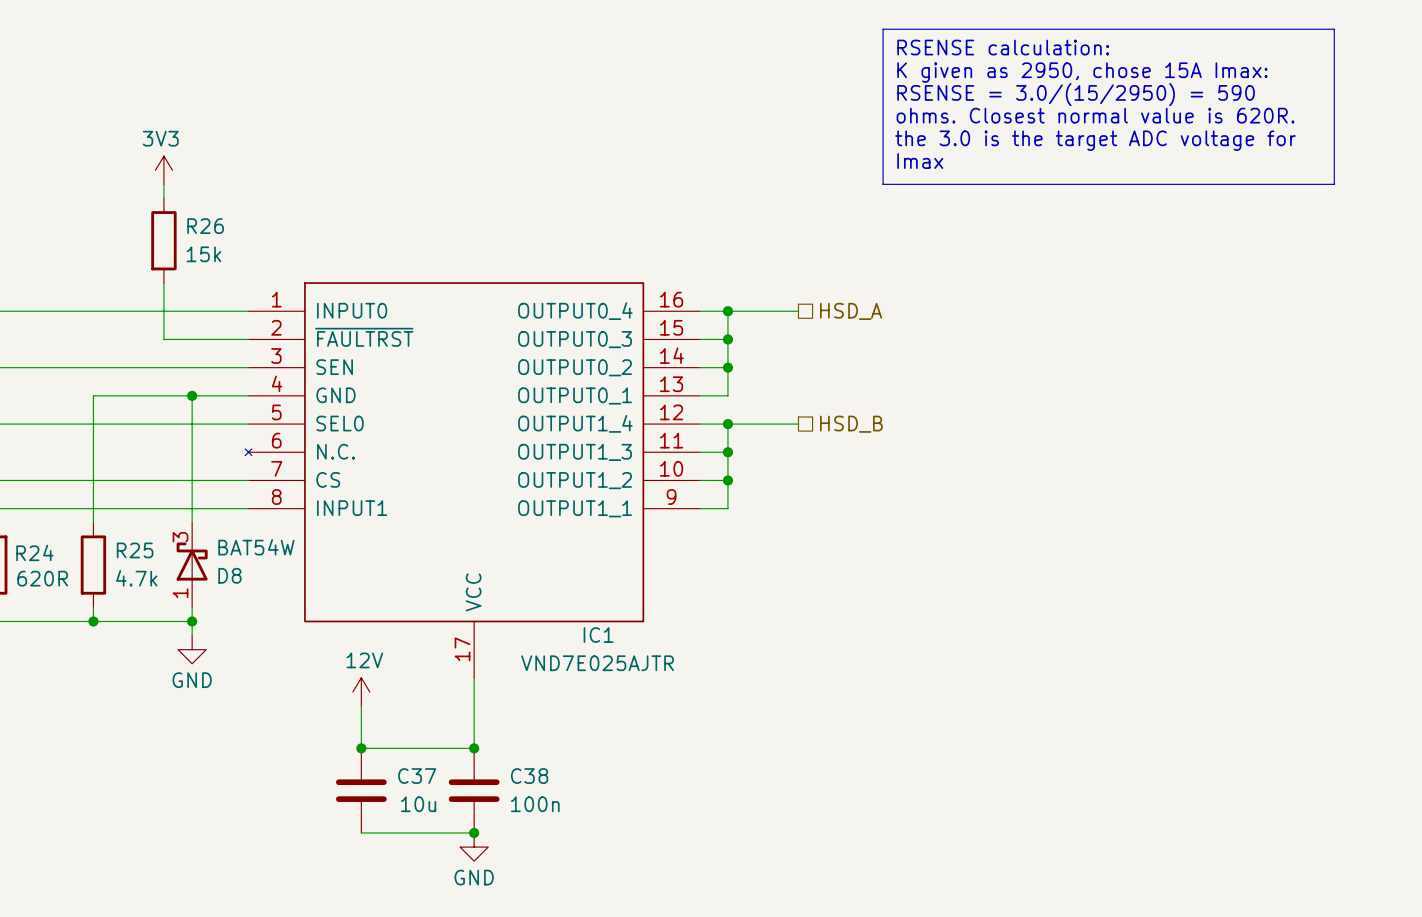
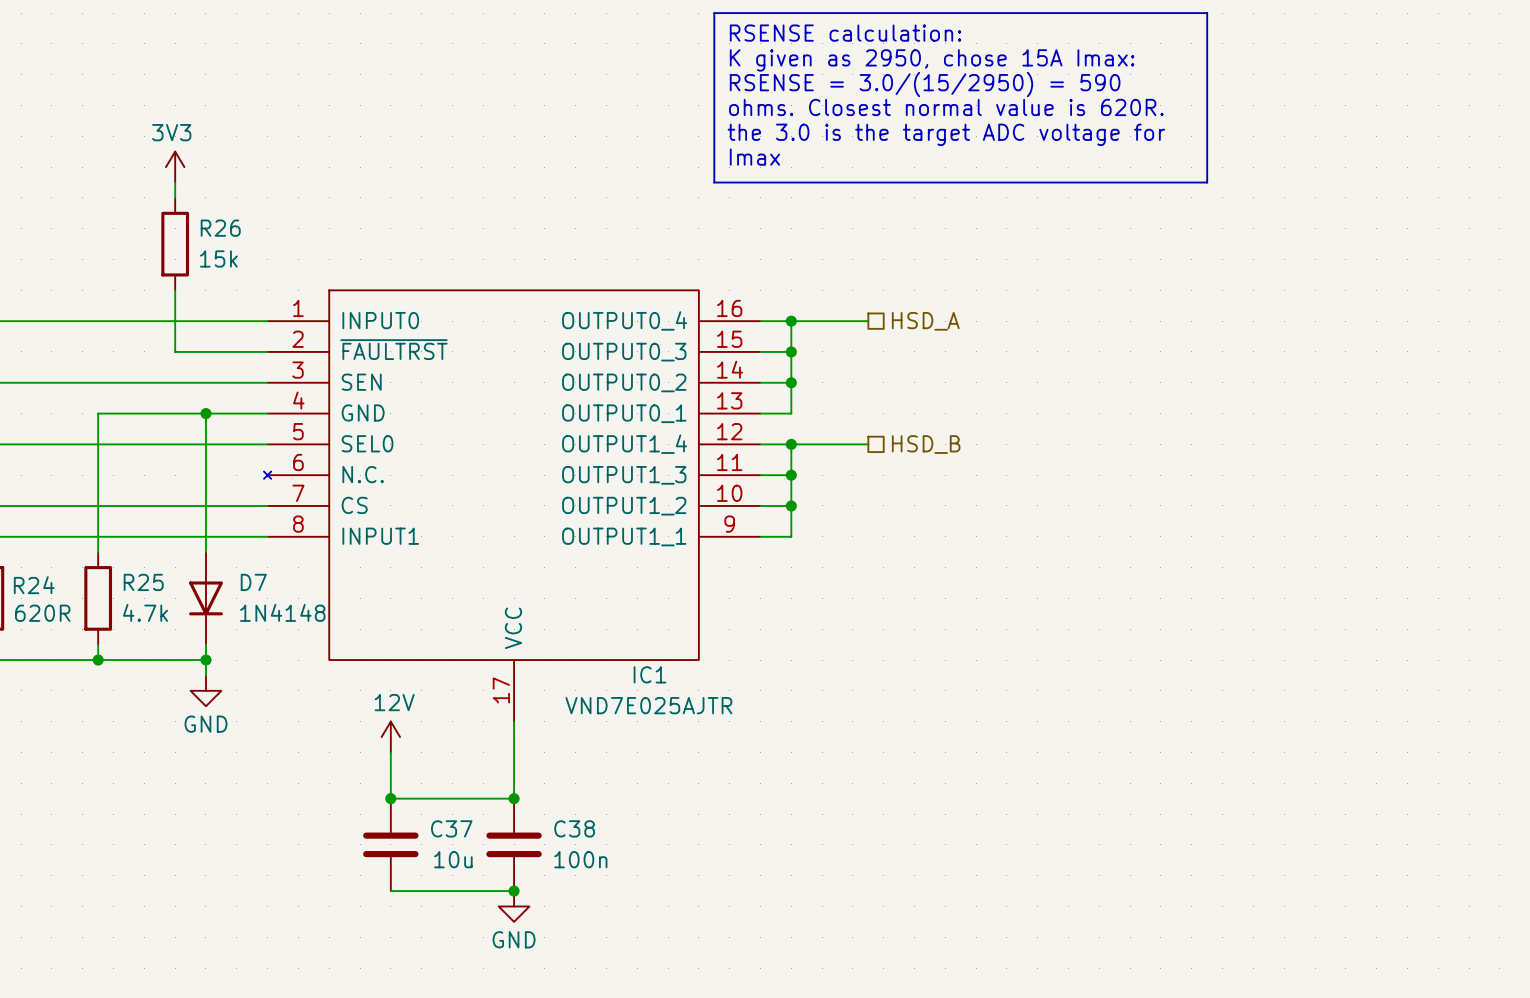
line: (883, 29) (883, 184) -> (960, 13) (714, 13) (714, 182) (960, 182)
line: (1108, 29) (1334, 29) (1334, 184) (1108, 184) -> (1207, 13) (1207, 182)
text position: RSENSE calculation: (1003, 47) -> RSENSE calculation: (845, 33)
text position: K given as 2950, chose 15A Imax: (1082, 72) -> K given as 2950, chose 15A Imax: (932, 60)
text position: RSENSE = 3.0/(15/2950) = 590 (1076, 94) -> RSENSE = 3.0/(15/2950) = 590 (925, 84)
text position: ohms. Closest normal value is 620R. (1095, 115) -> ohms. Closest normal value is 620R. (946, 107)
text position: the 3.0 is the target ADC voltage for (1095, 140) -> the 3.0 is the target ADC voltage for (946, 134)
text position: Imax (920, 161) -> Imax (754, 157)
D8: BAT54W (192, 565) -> none
D7: none -> 1N4148 (205, 598)

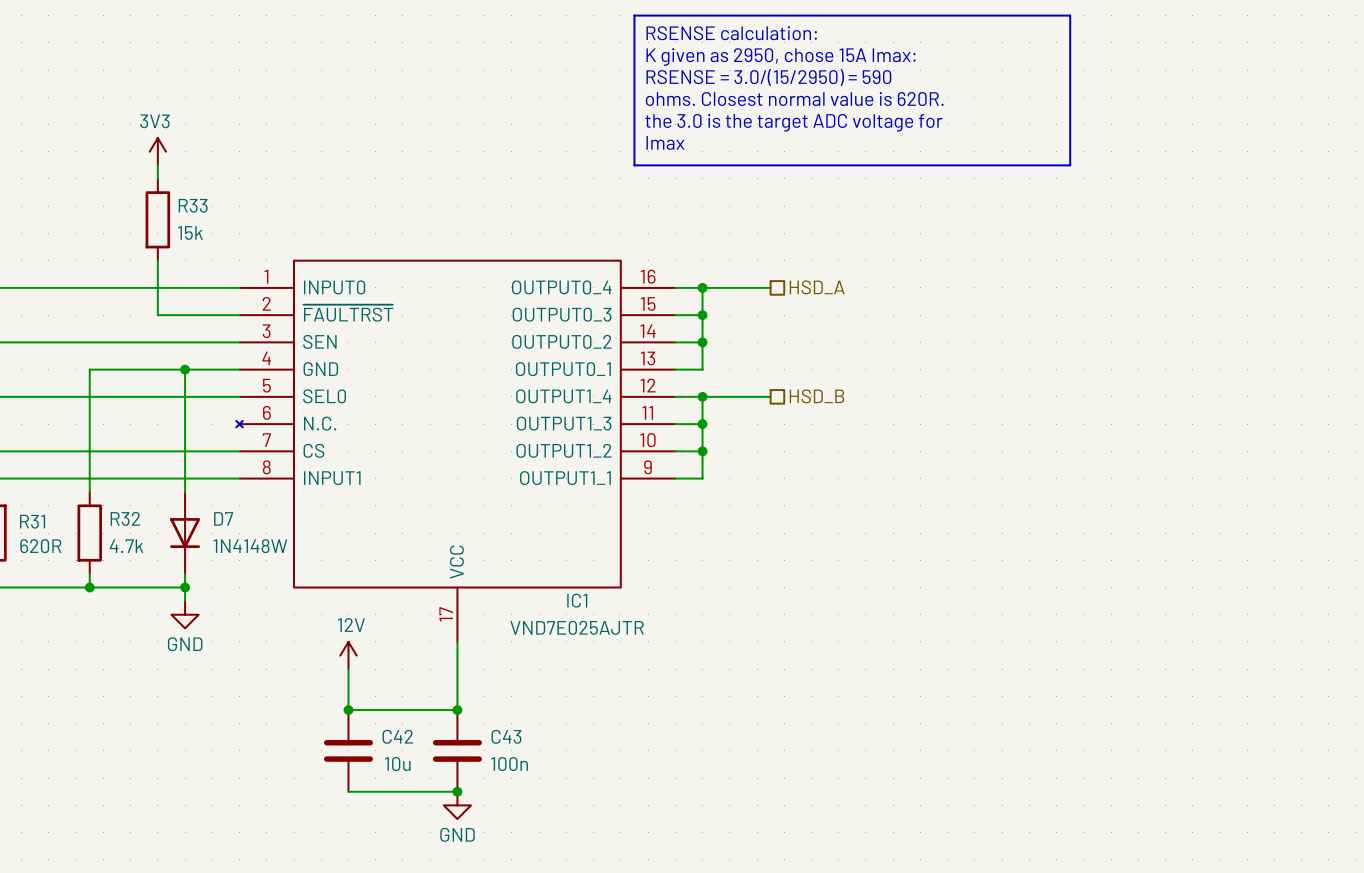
R26 name: R26 (220, 228) -> R33 (193, 205)
R25 name: R25 (143, 582) -> R32 (125, 518)
R24 name: R24 (34, 585) -> R31 (32, 521)
D7 value: 1N4148 (282, 612) -> 1N4148W (250, 546)
C37 name: C37 (451, 828) -> C42 (397, 736)
C38 name: C38 (574, 828) -> C43 (506, 736)

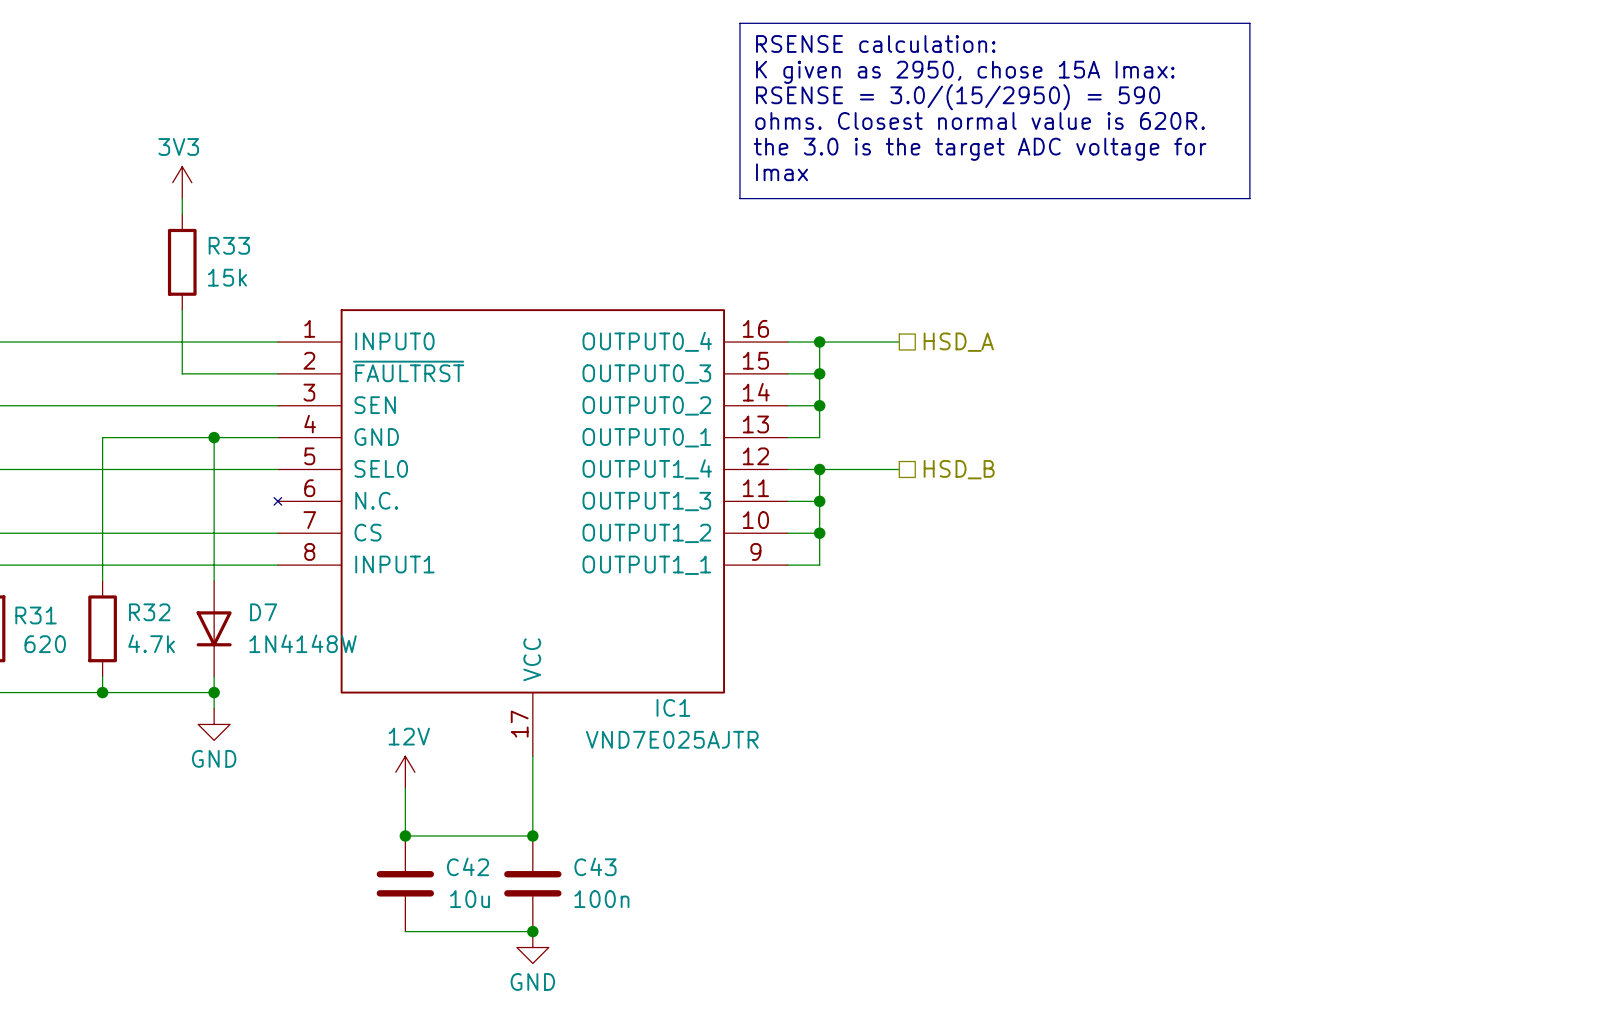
R31 value: 620R (40, 546) -> 620 (45, 644)

